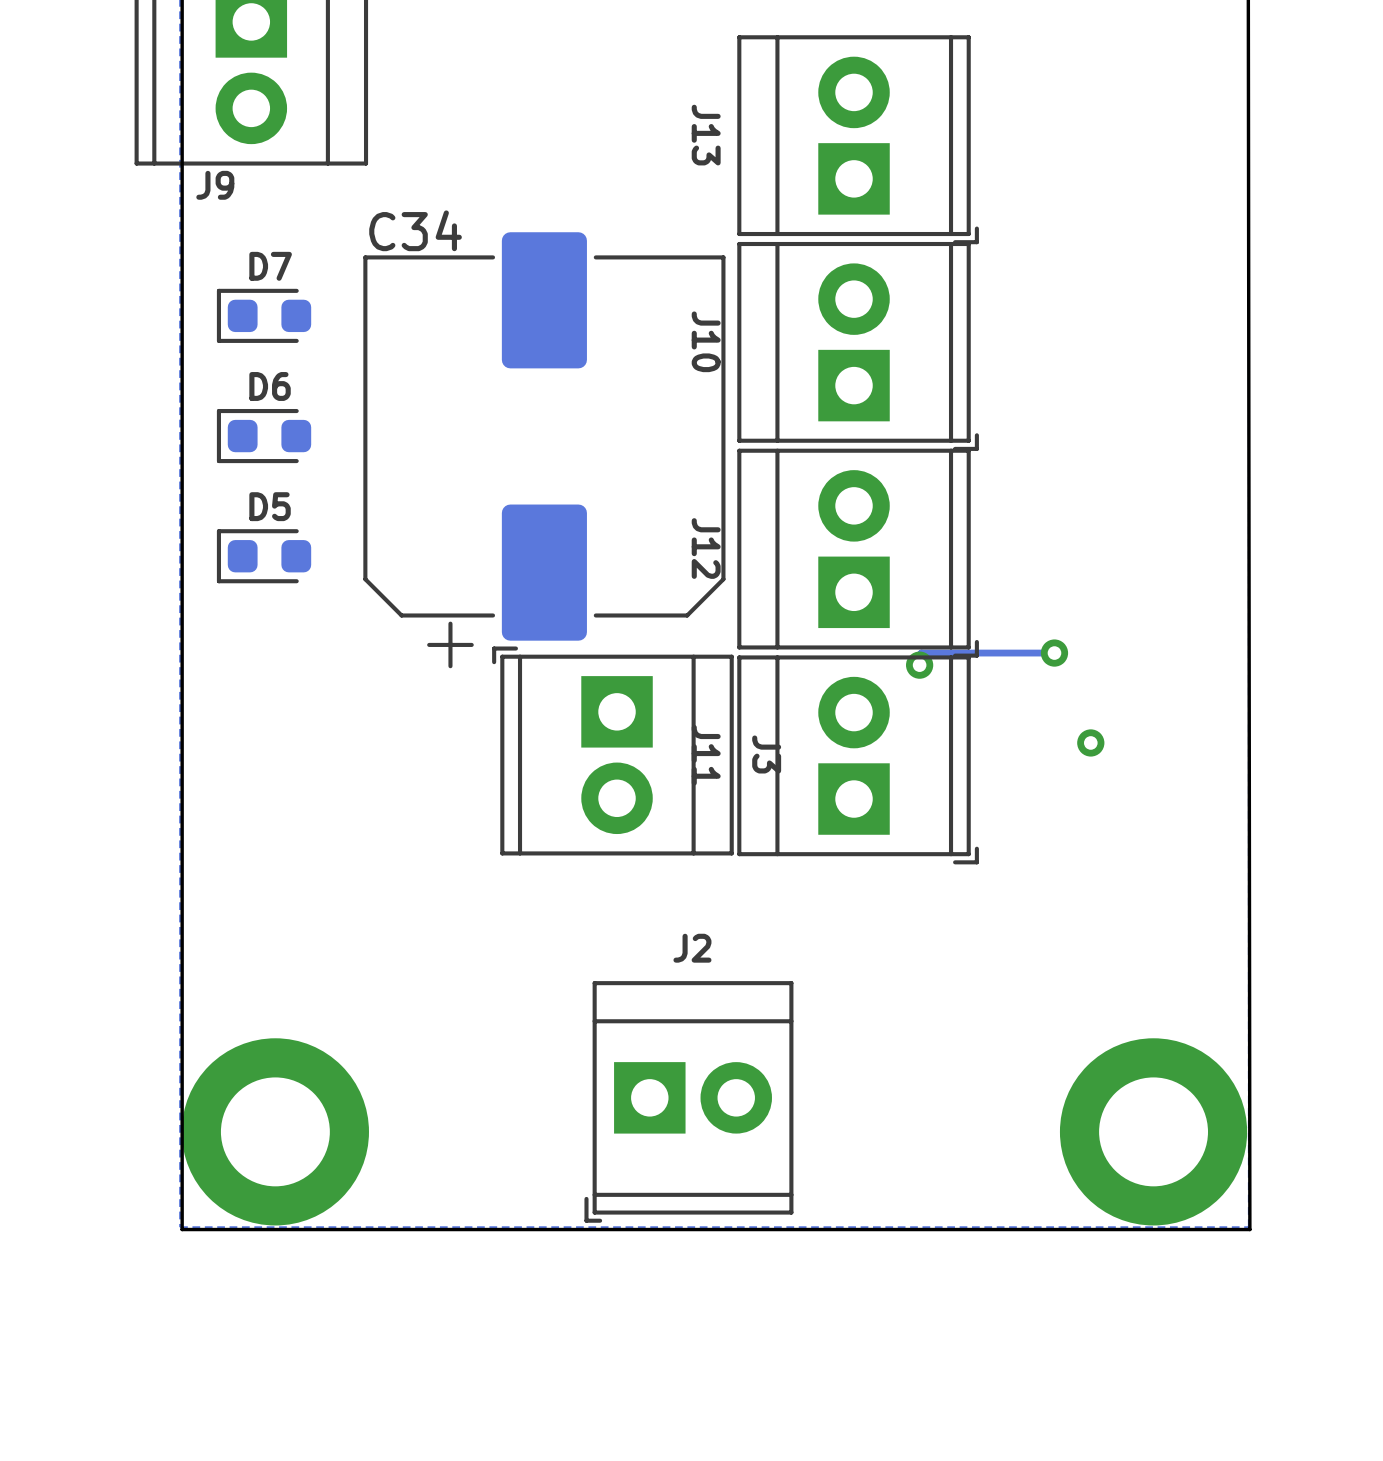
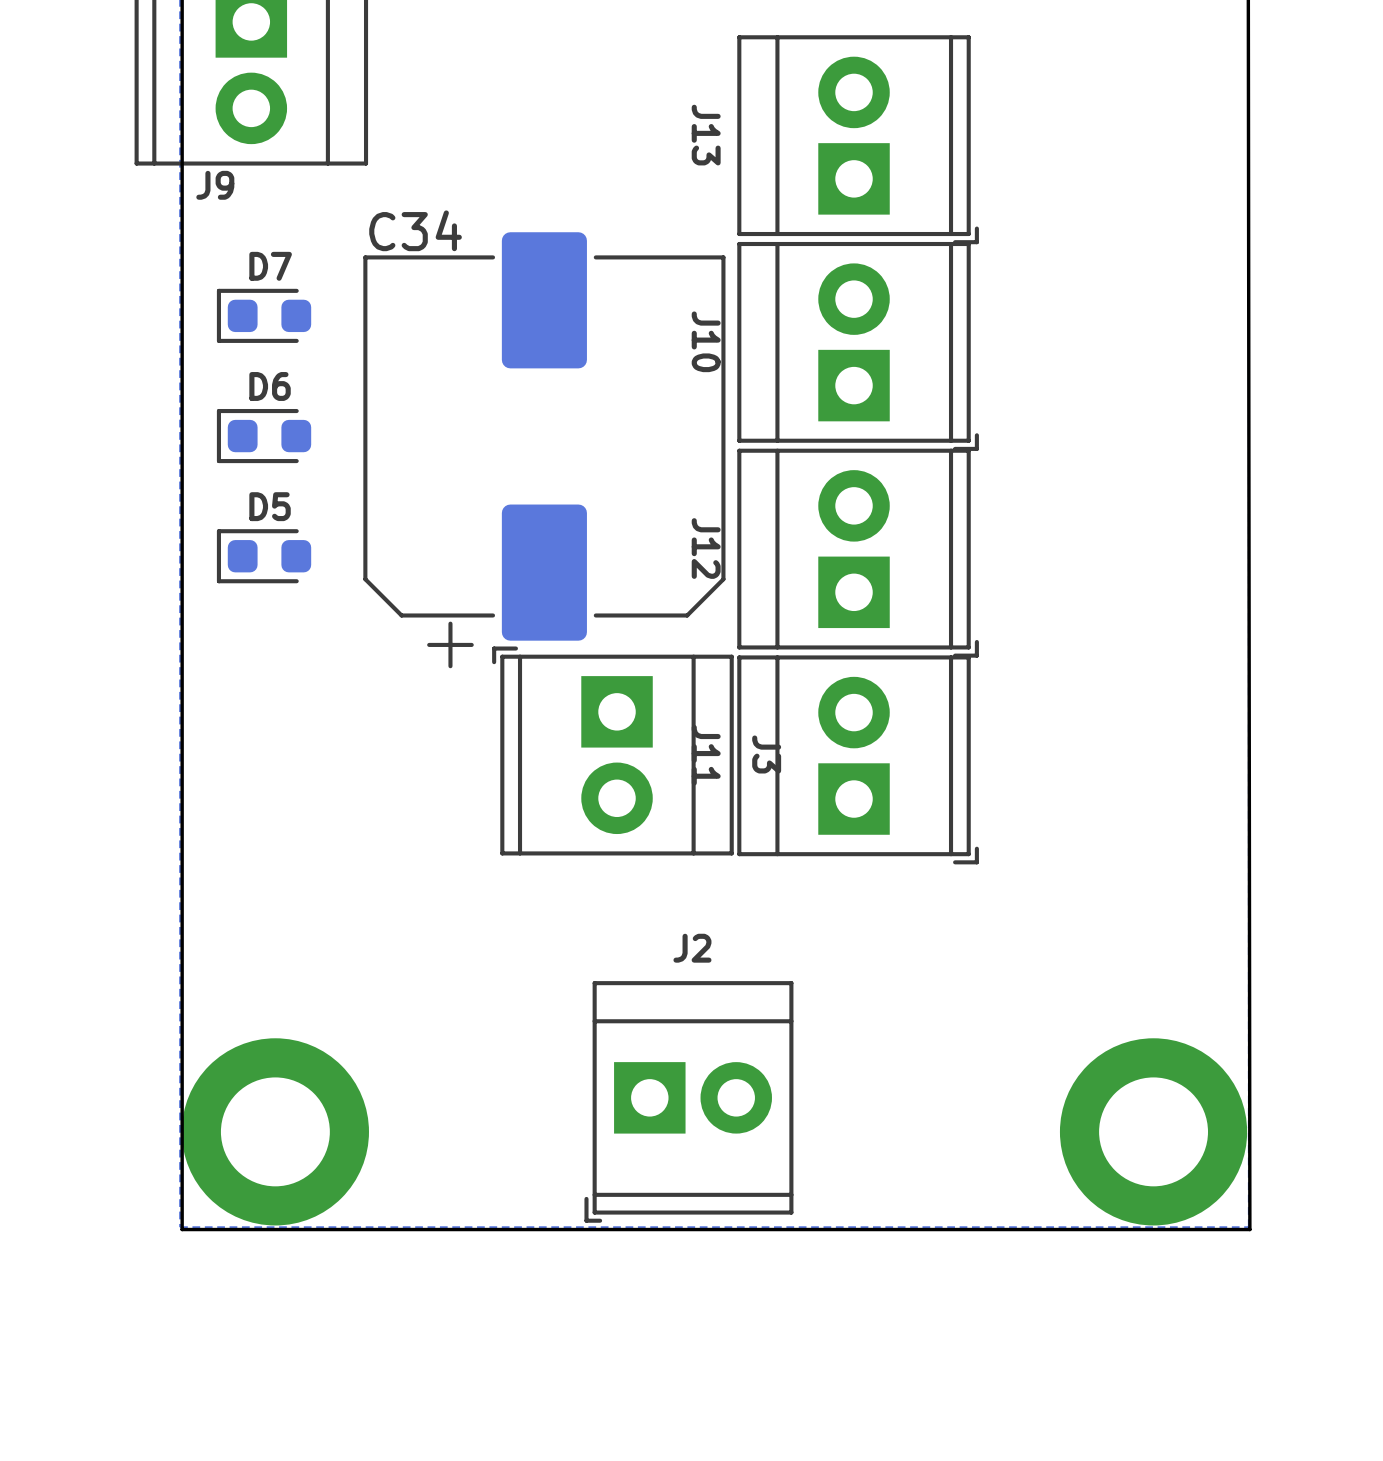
track: (1054, 653) (921, 653) (919, 665) -> none
via: (1054, 653) -> none
via: (919, 665) -> none
via: (1090, 742) -> none

